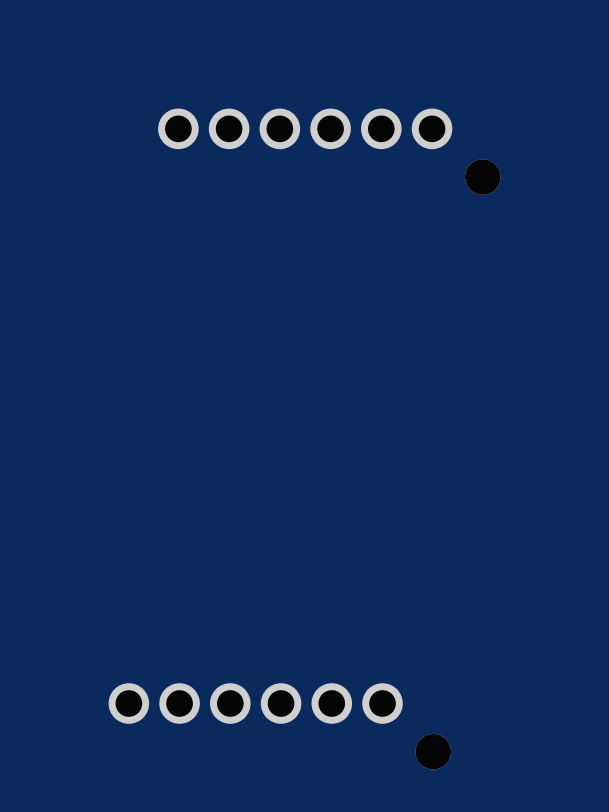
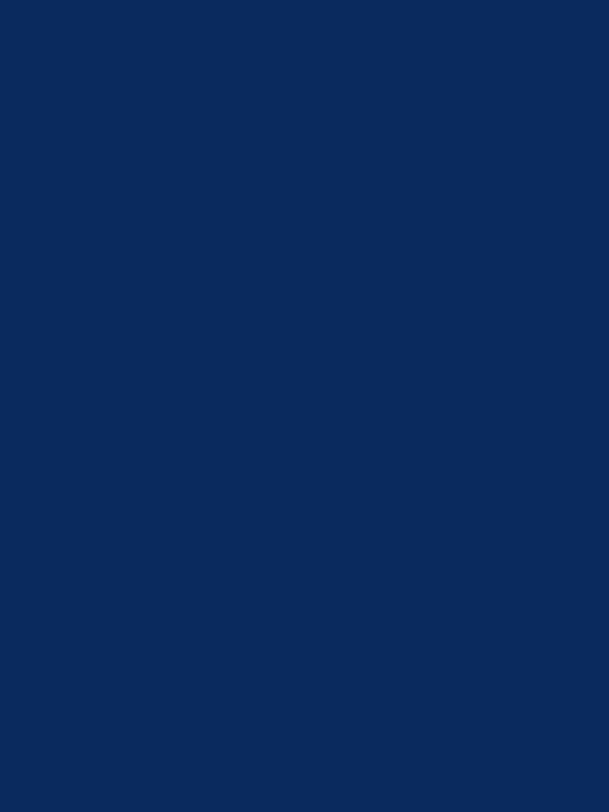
part: (329, 151) -> none
part: (279, 726) -> none

